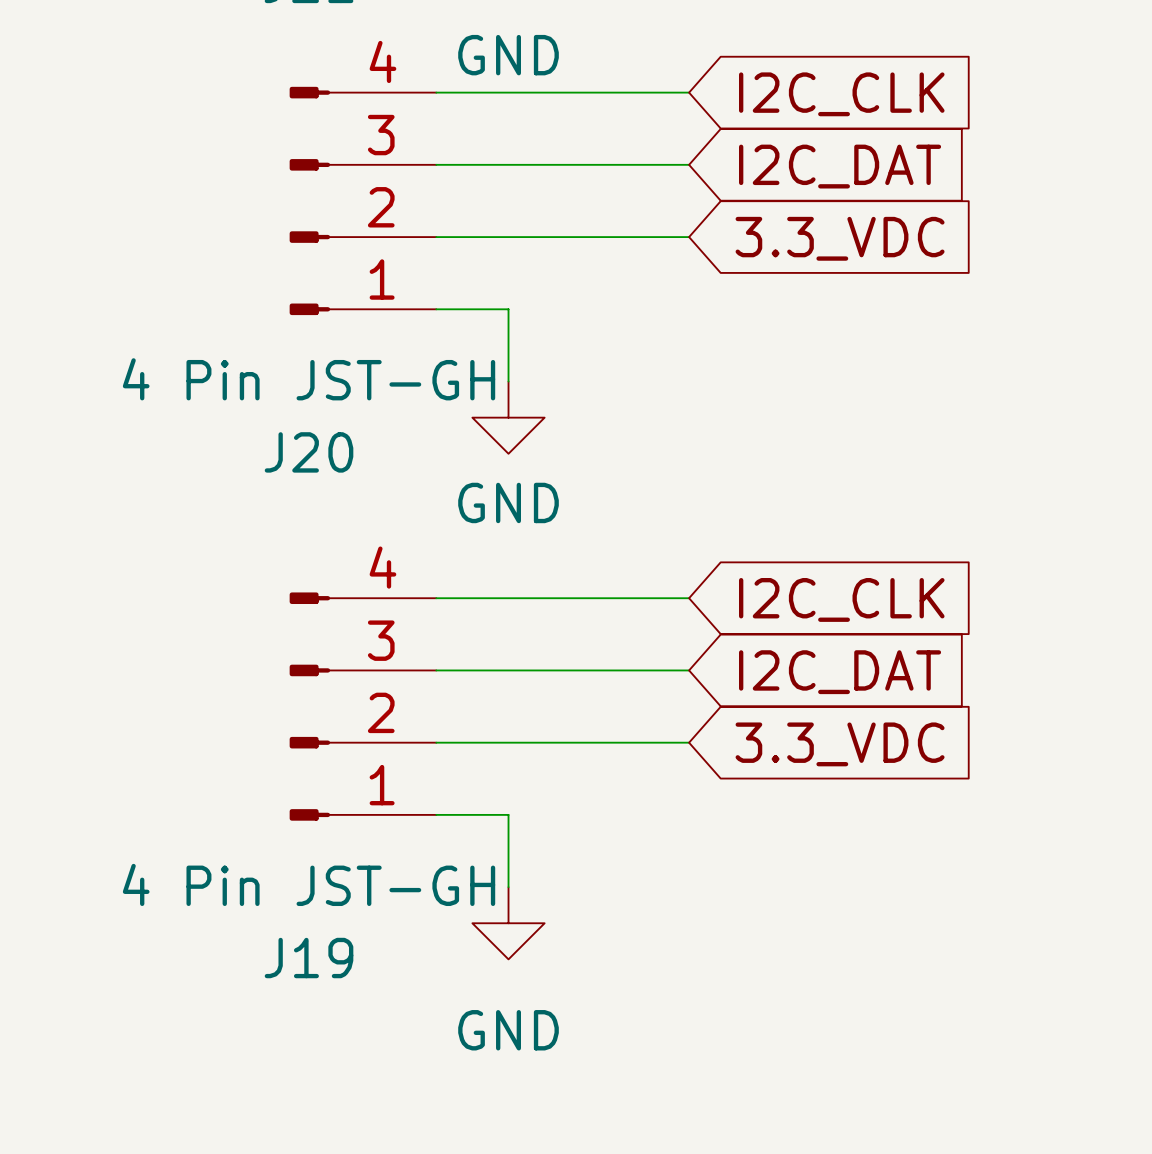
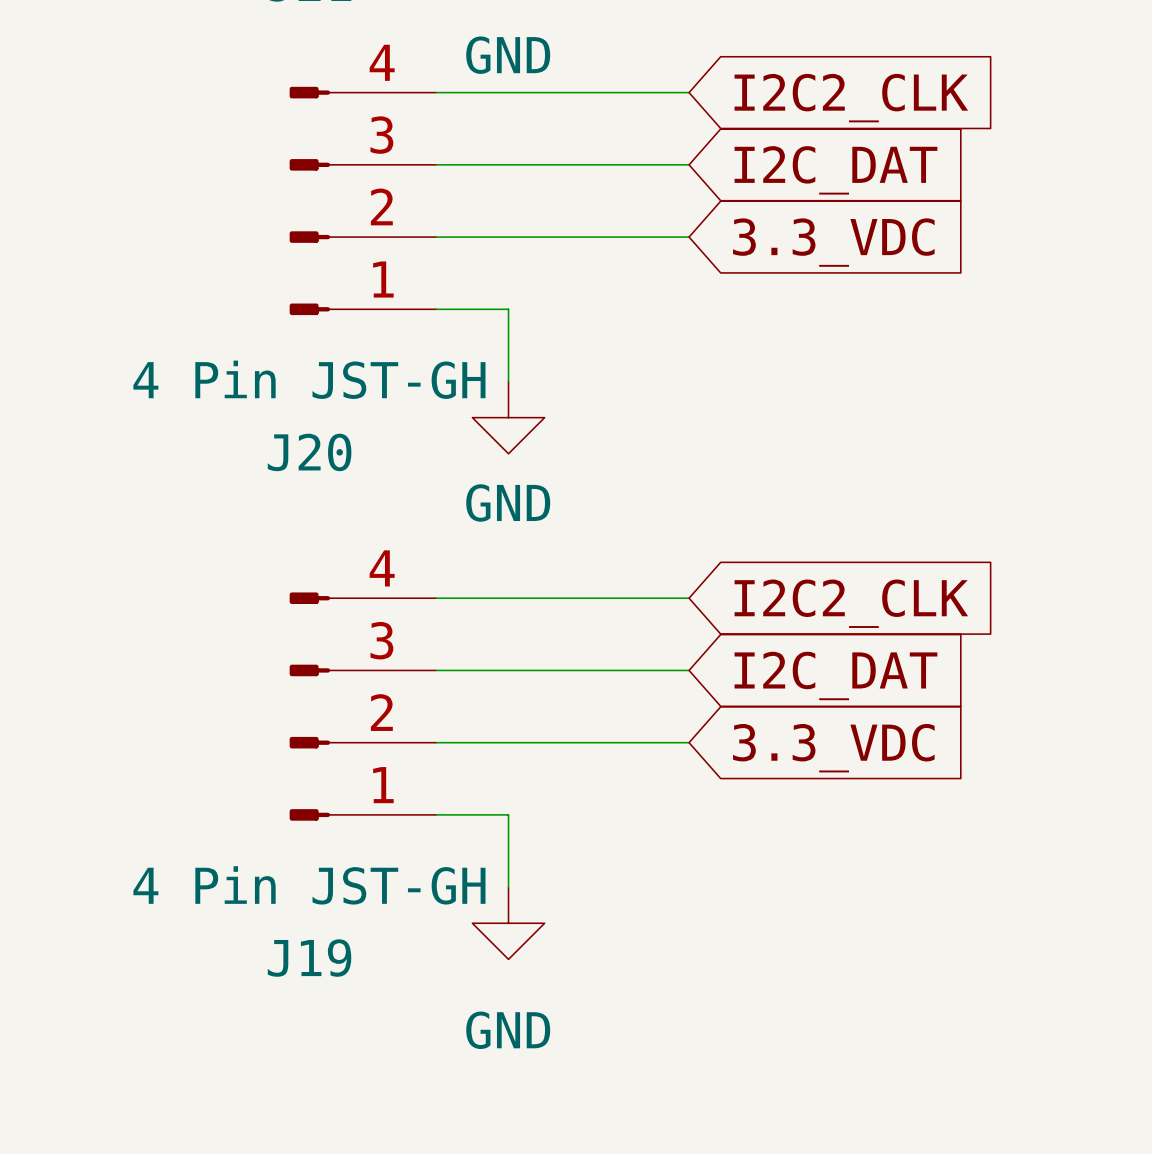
global label: I2C_CLK (841, 94) -> I2C2_CLK (851, 98)
global label: I2C_CLK (841, 599) -> I2C2_CLK (851, 603)

